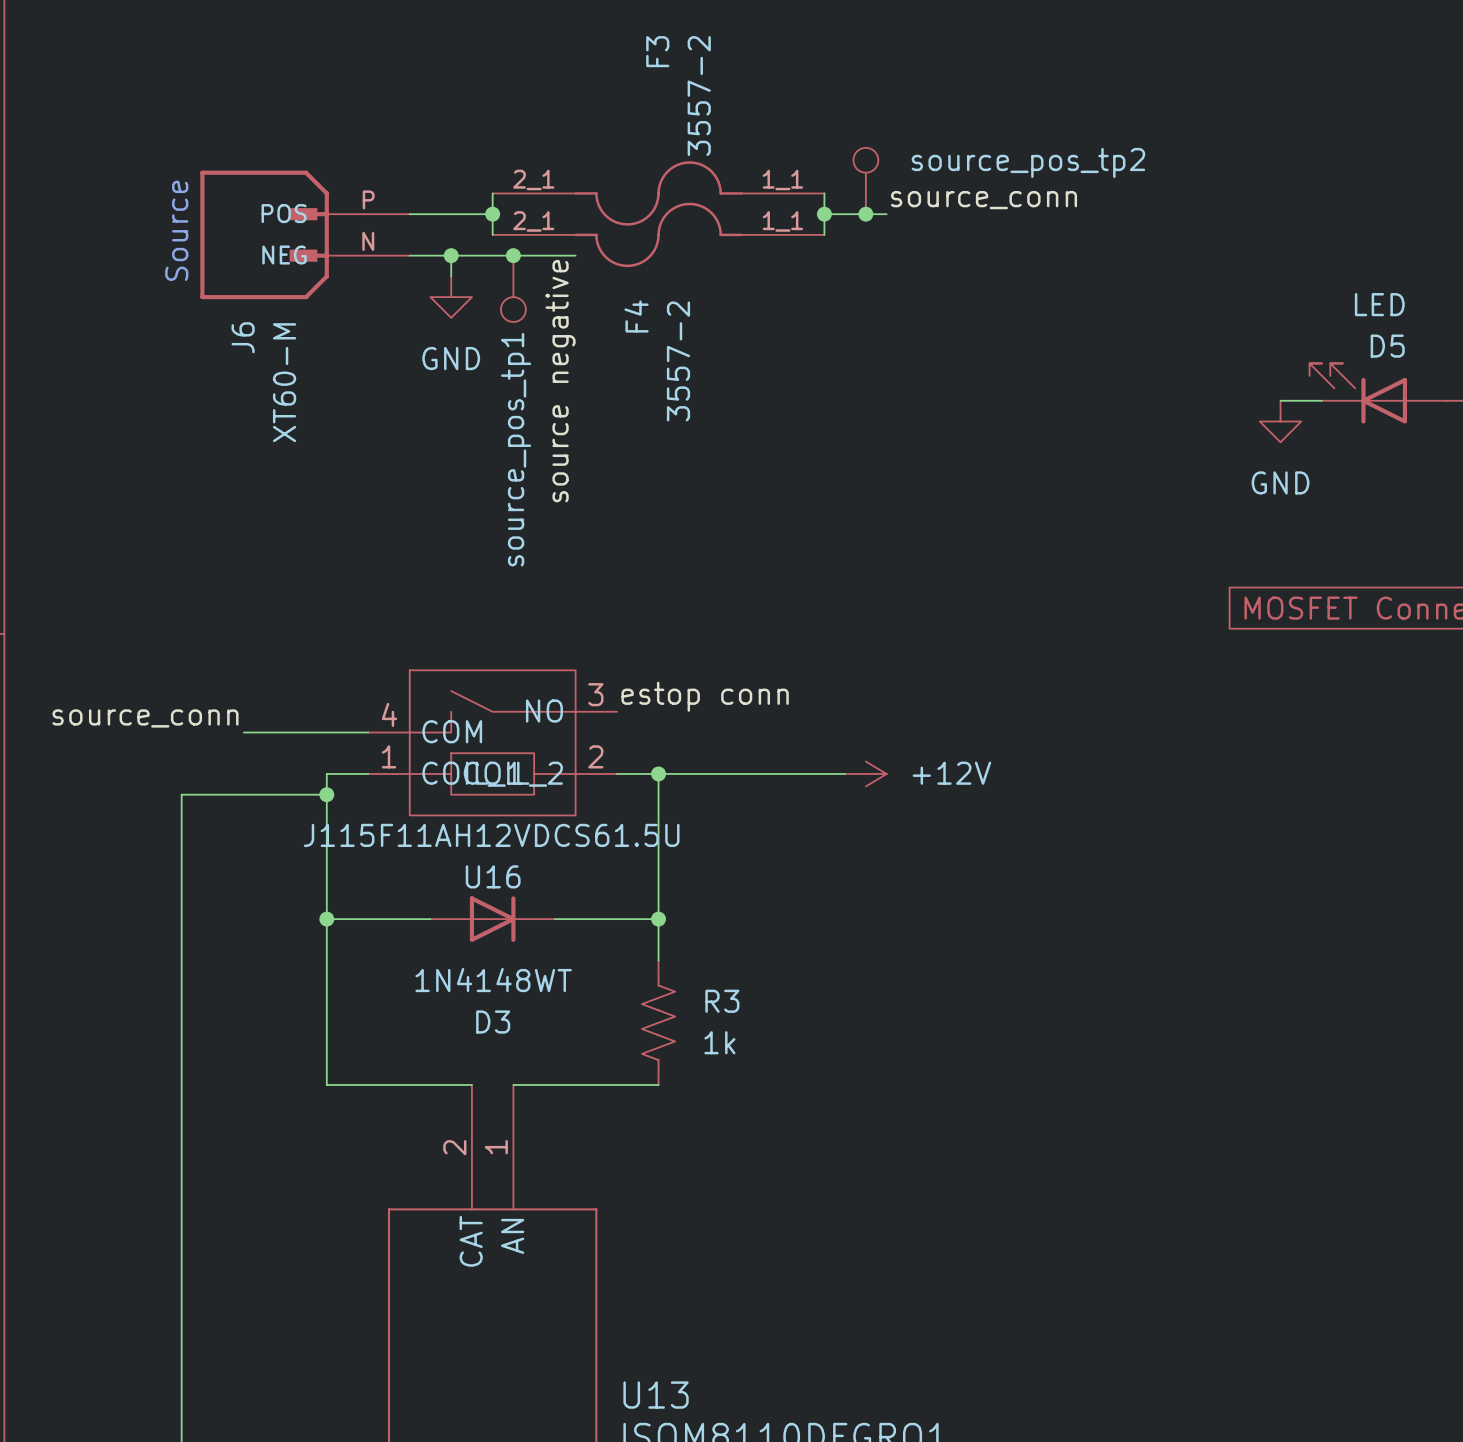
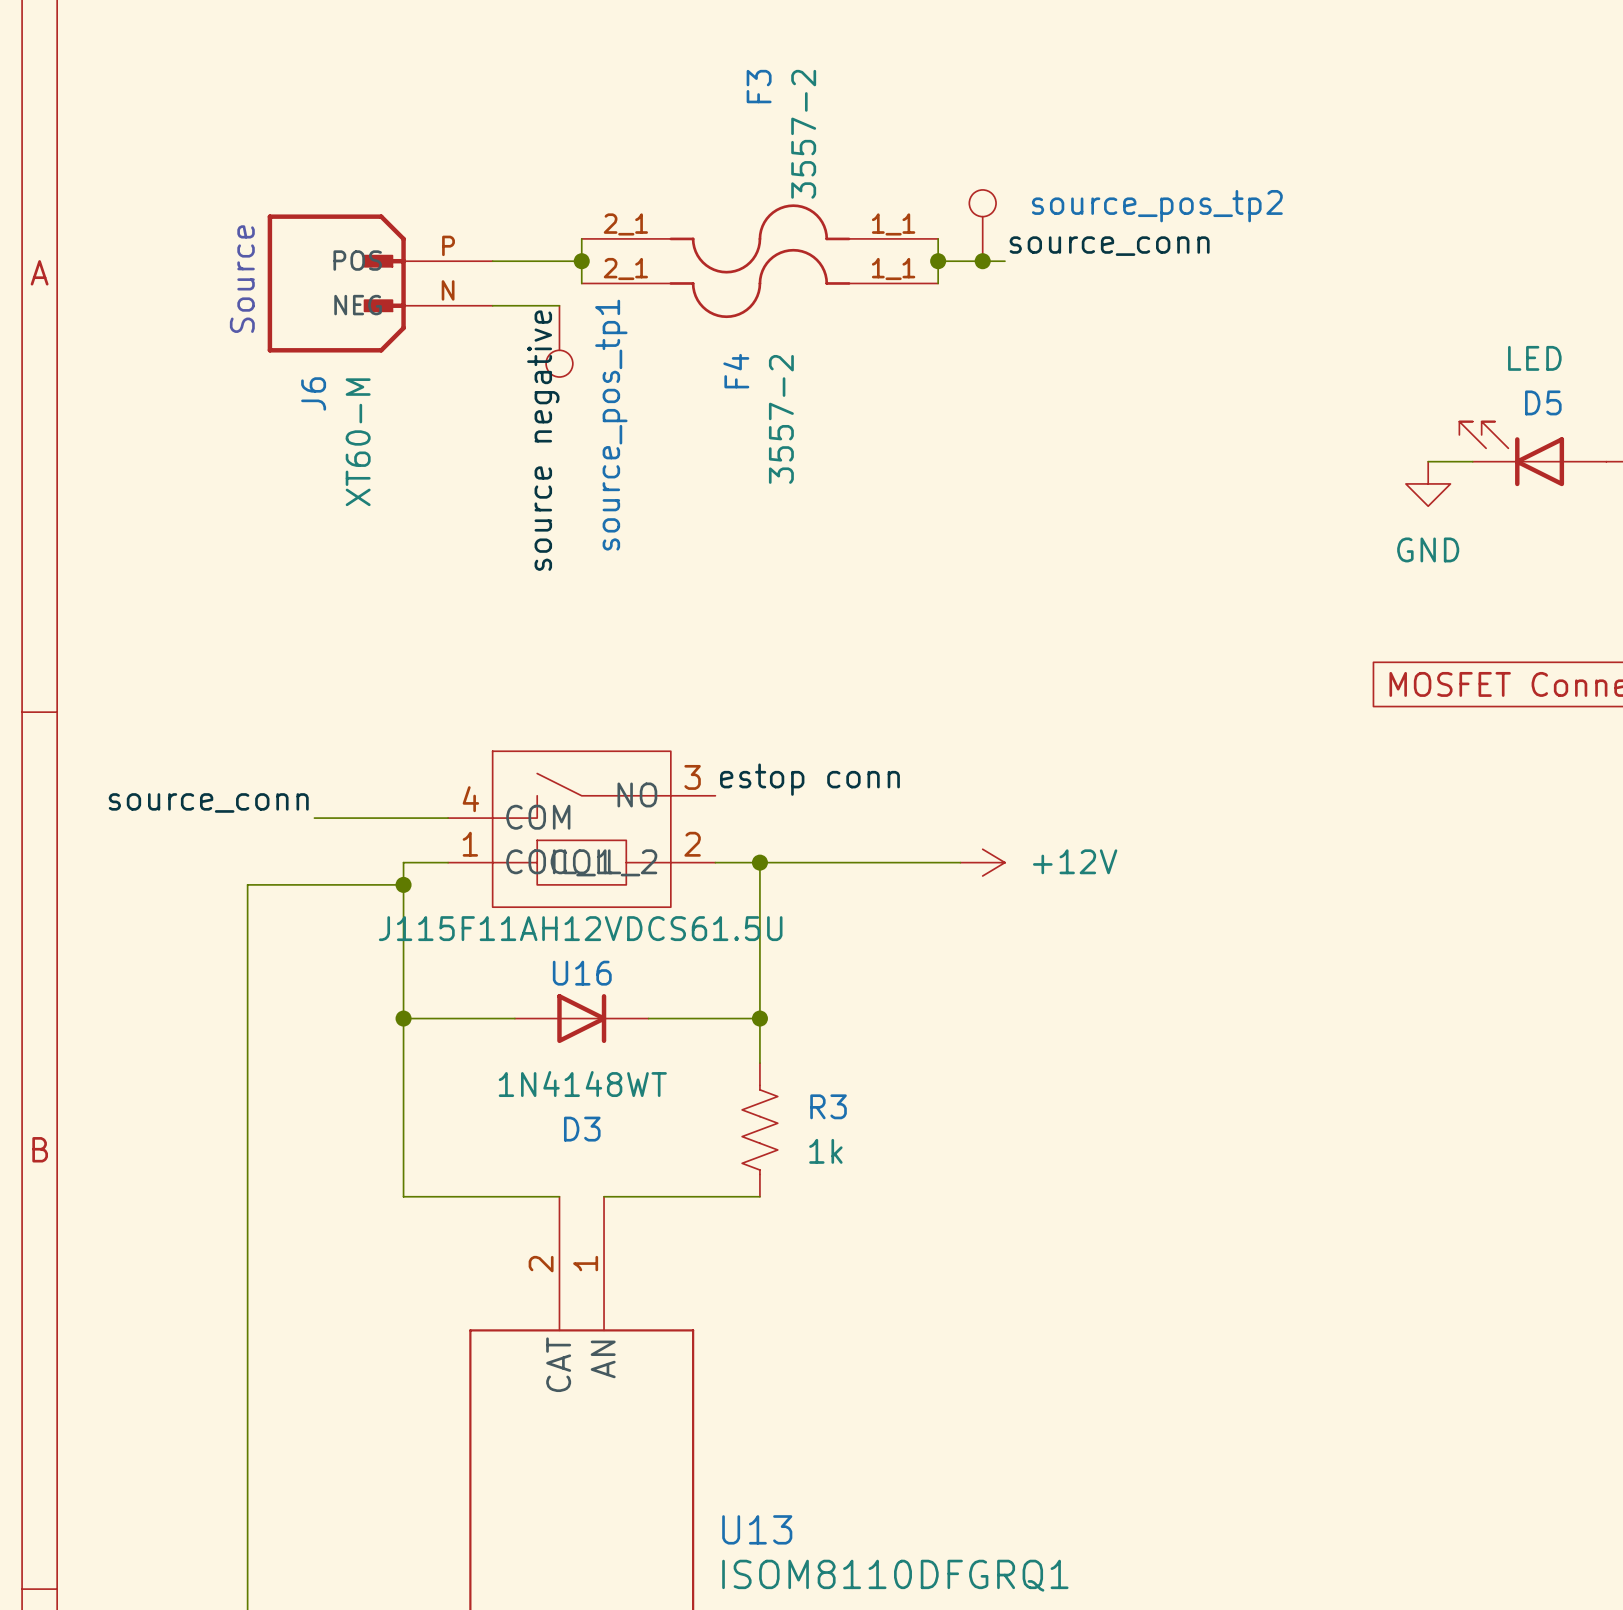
wire: (451, 255) (451, 276) -> none
junction: (451, 255) -> none
wire: (471, 255) (575, 255) -> none
junction: (513, 255) -> none
source_pos_tp1 position: (513, 288) -> (559, 341)
power symbol: GND (451, 297) -> none
label position: source negative (560, 381) -> source negative (543, 440)
source_pos_tp1 name position: source_pos_tp1 (516, 449) -> source_pos_tp1 (611, 425)

